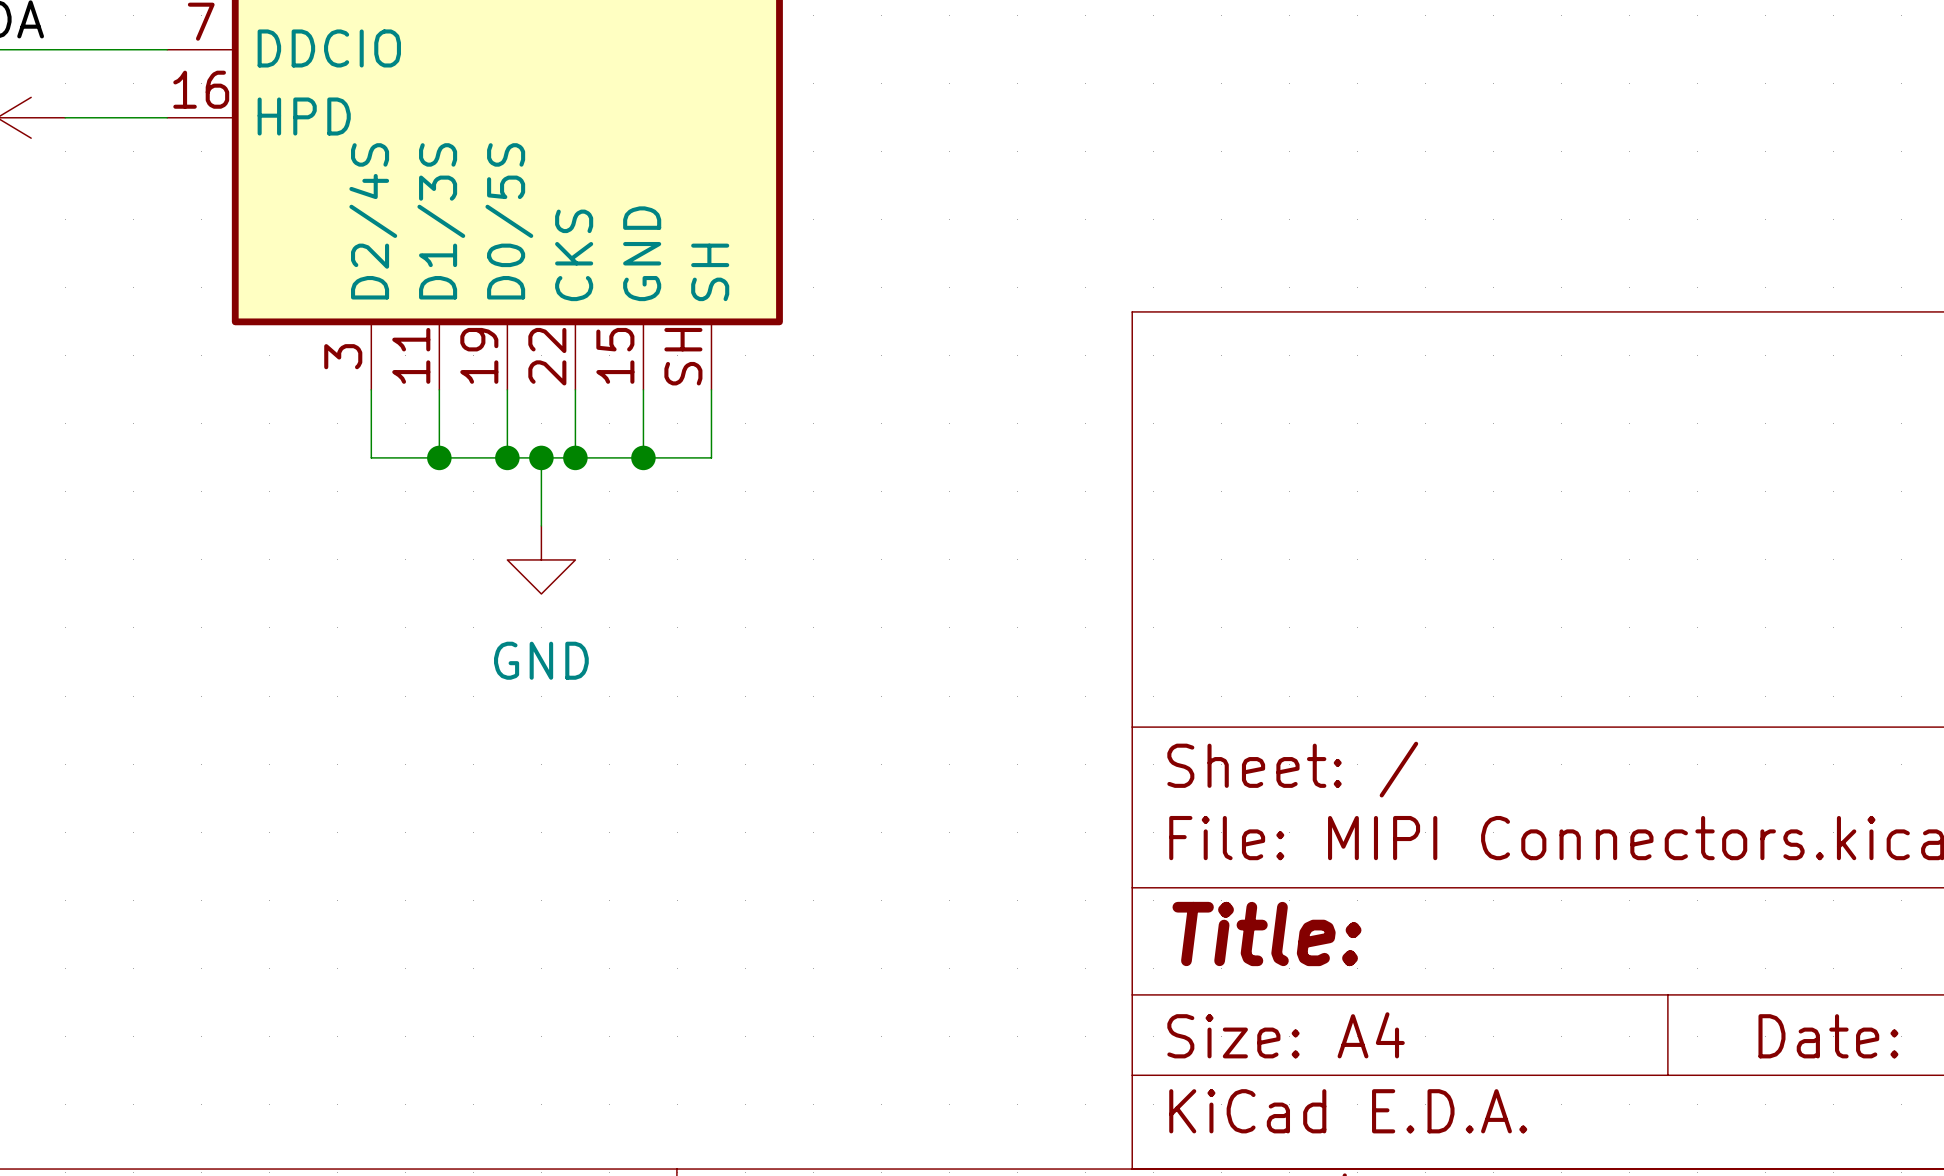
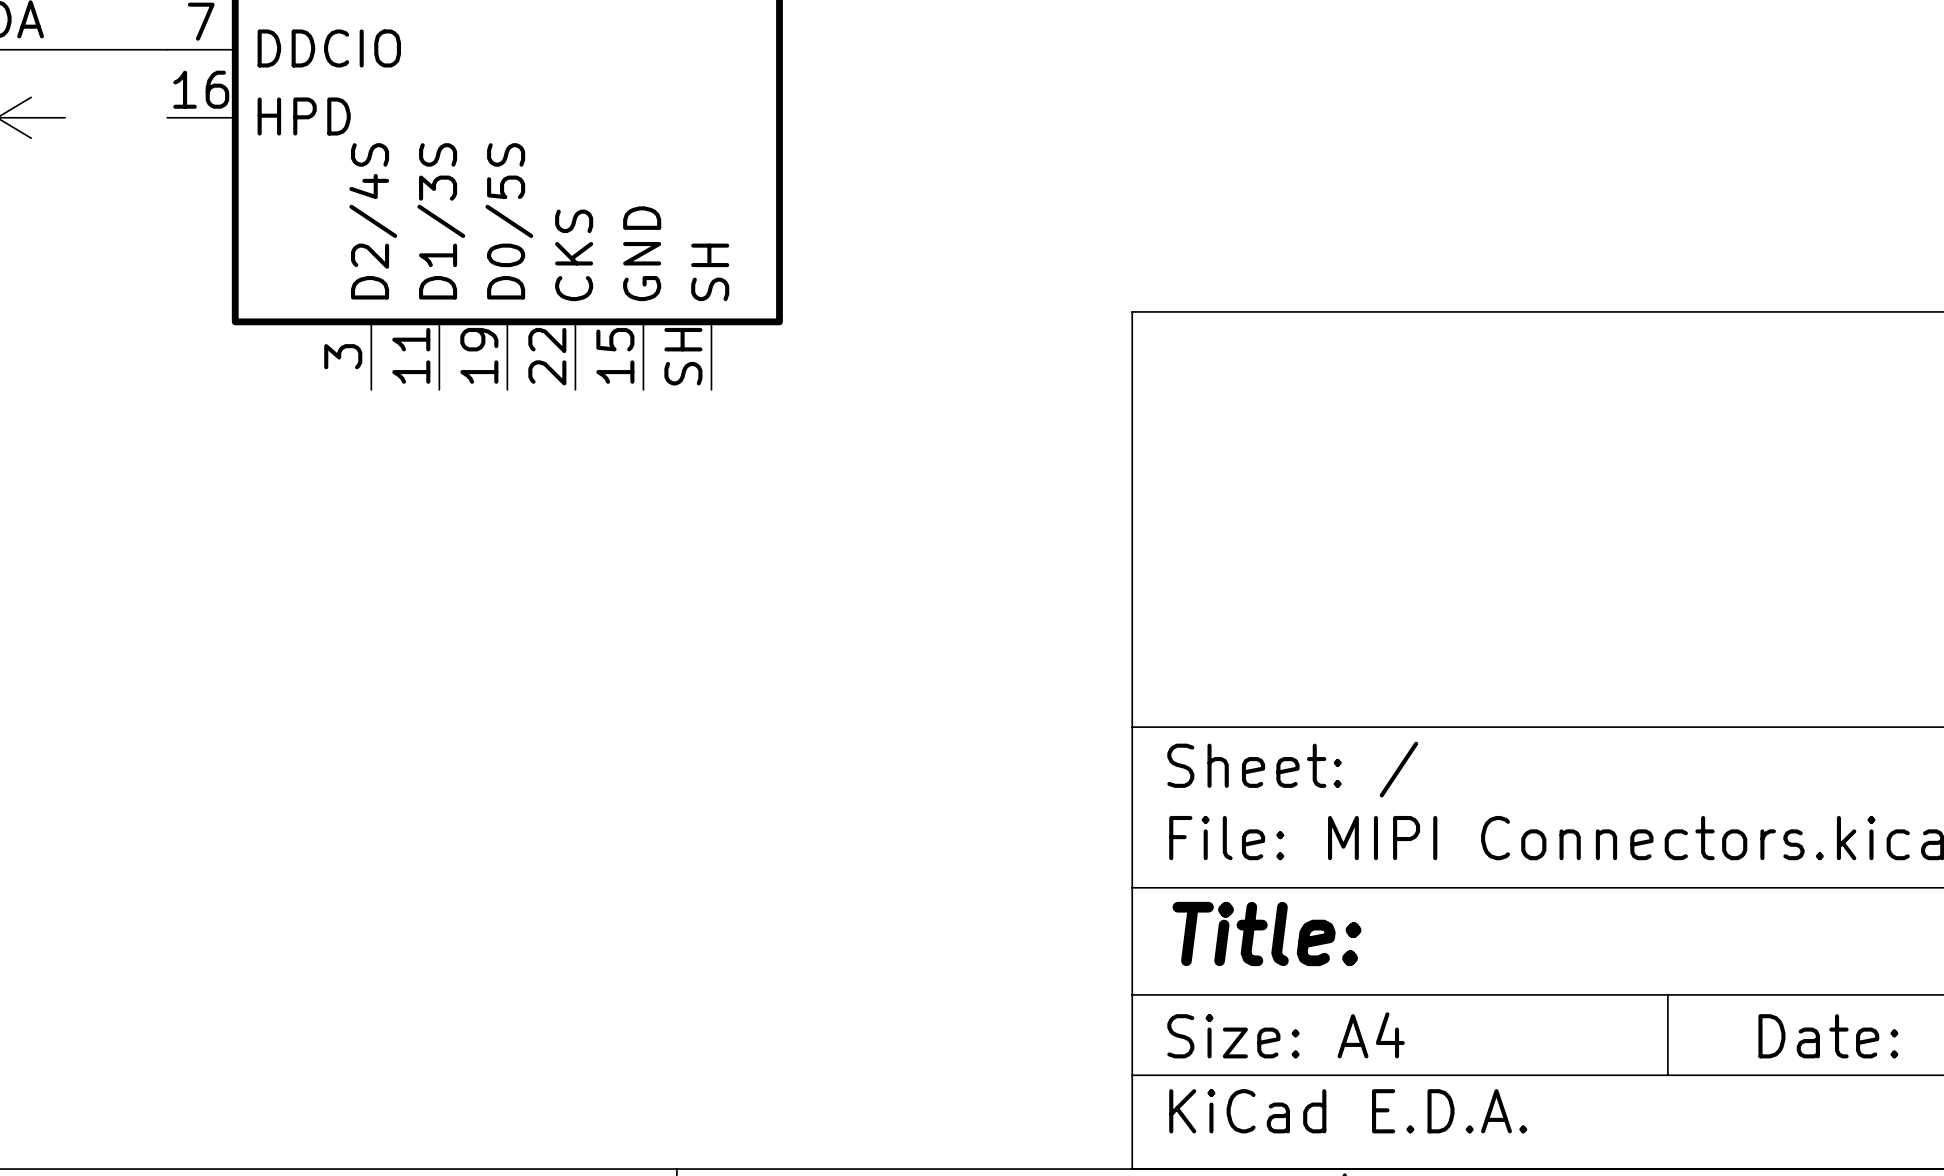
wire: (65, 117) (167, 117) -> none
wire: (371, 389) (371, 457) (711, 457) (711, 389) -> none
wire: (439, 389) (439, 457) -> none
wire: (507, 389) (507, 457) -> none
wire: (575, 389) (575, 457) -> none
wire: (643, 389) (643, 457) -> none
junction: (439, 457) -> none
junction: (507, 457) -> none
wire: (541, 457) (541, 525) -> none
junction: (541, 457) -> none
junction: (575, 457) -> none
junction: (643, 457) -> none
power symbol: GND (541, 559) -> none

